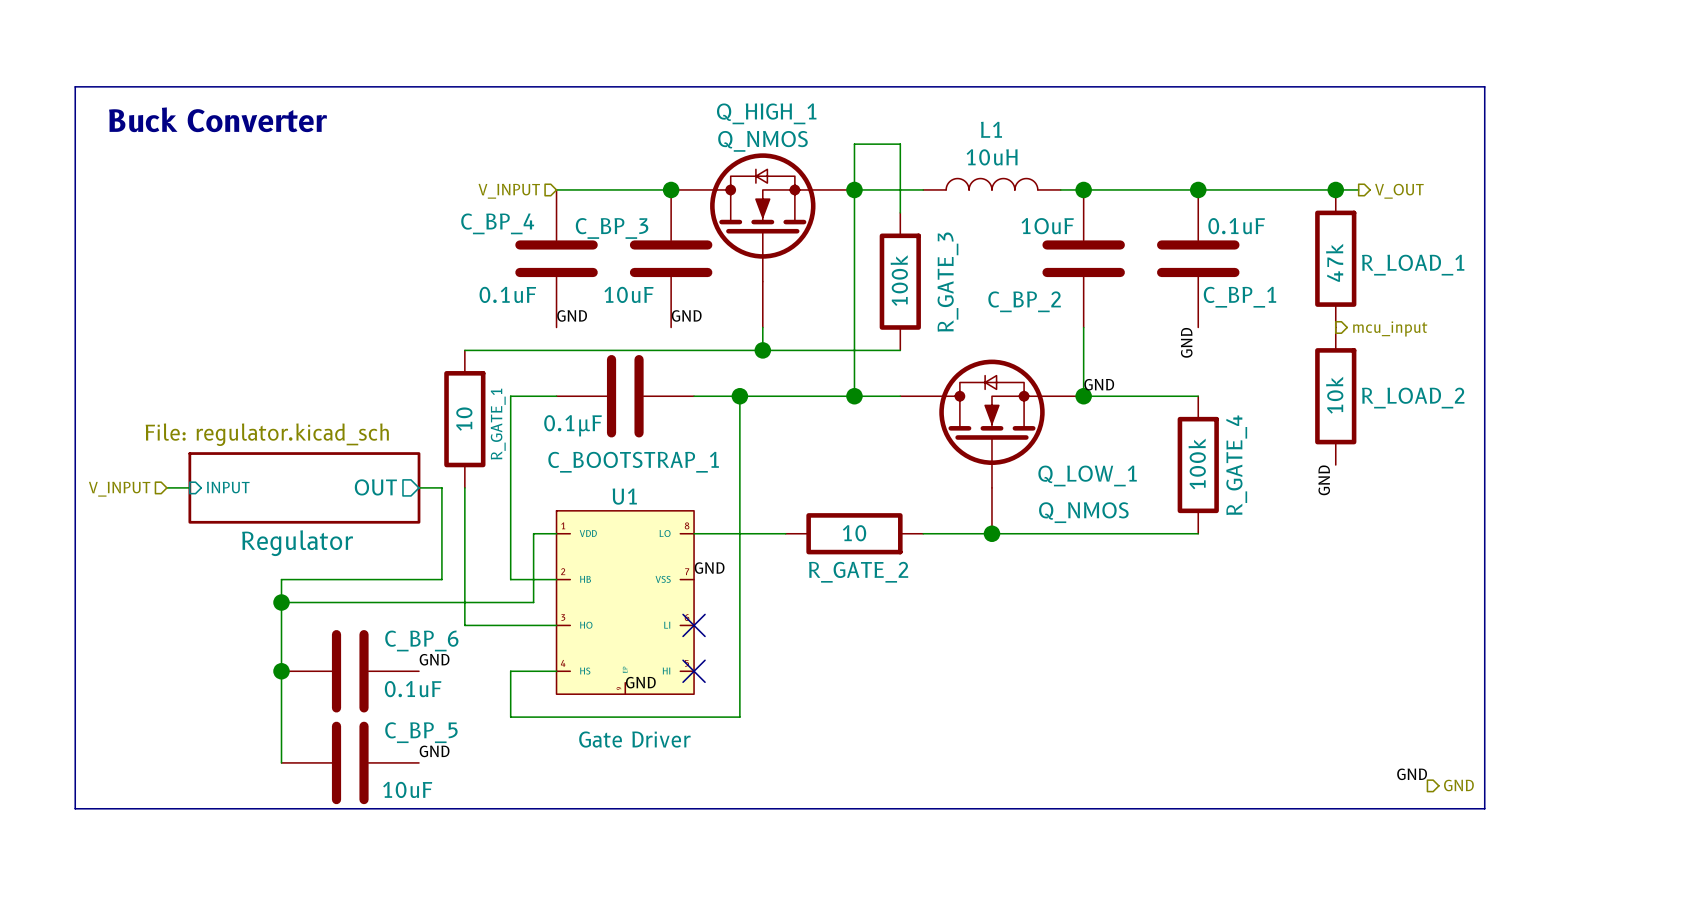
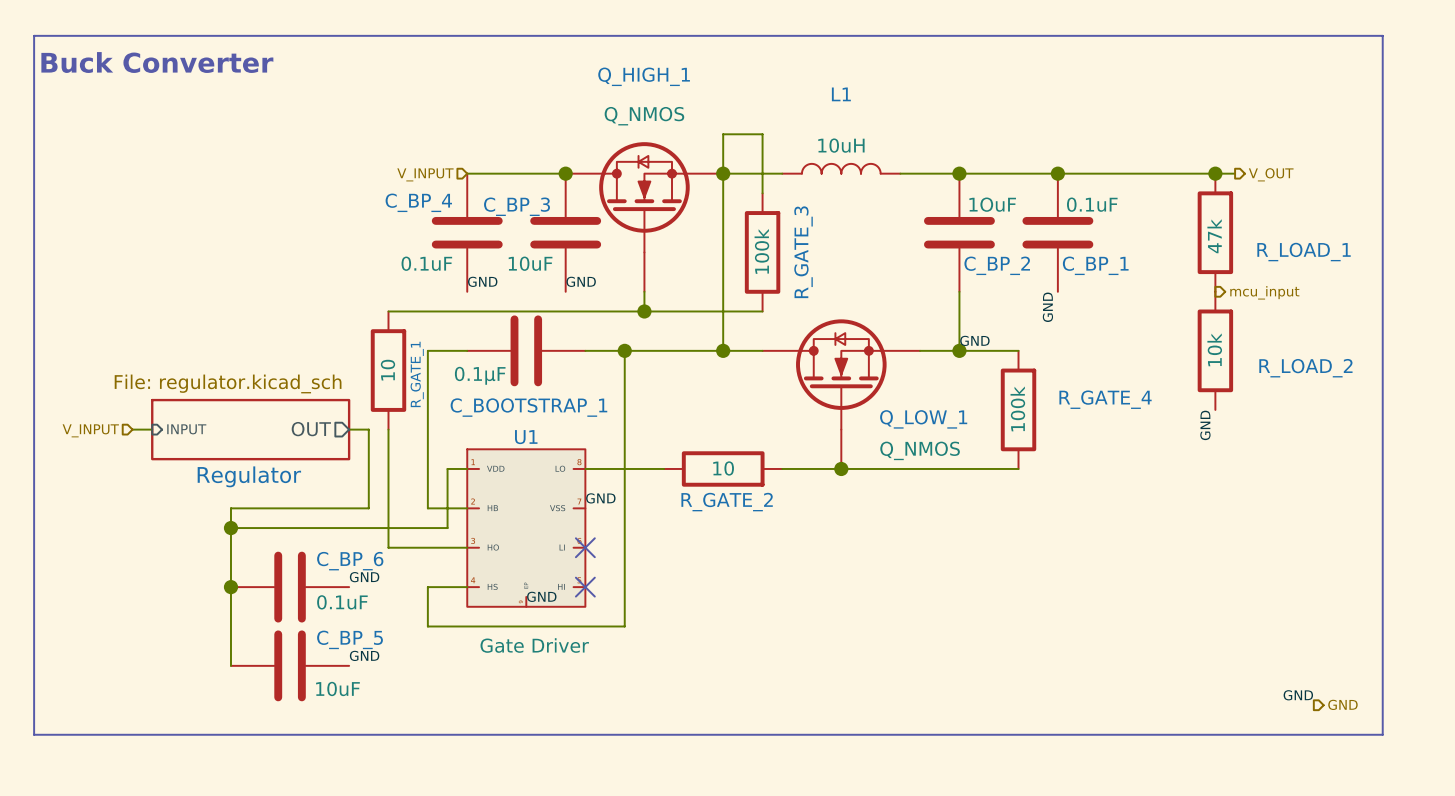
line: (75, 86) (1484, 86) (1484, 808) (75, 808) (75, 86) -> (34, 35) (34, 734) (1382, 734) (1382, 35) (34, 35)
Q_HIGH_1 name position: Q_HIGH_1 (766, 113) -> Q_HIGH_1 (644, 76)
text position: Buck Converter (218, 119) -> Buck Converter (157, 62)
L1 name position: L1 (991, 129) -> L1 (841, 94)
Q_HIGH_1 value position: Q_NMOS (762, 141) -> Q_NMOS (644, 116)
junction: (1083, 189) -> none
junction: none -> (959, 173)
junction: (1198, 189) -> none
junction: none -> (1057, 173)
junction: (1335, 189) -> none
wire: none -> (1156, 173) (1235, 173)
junction: none -> (1215, 173)
hierarchical label position: V_OUT (1399, 191) -> V_OUT (1271, 174)
C_BP_2 value position: 1OuF (1047, 226) -> 1OuF (992, 204)
C_BP_2 position: (1083, 258) -> (959, 232)
C_BP_1 position: (1198, 258) -> (1057, 232)
R_LOAD_1 position: (1335, 258) -> (1215, 232)
R_LOAD_1 name position: R_LOAD_1 (1413, 265) -> R_LOAD_1 (1304, 252)
C_BP_2 name position: C_BP_2 (1024, 301) -> C_BP_2 (997, 265)
wire: (1083, 327) (1083, 396) -> (959, 291) (959, 350)
hierarchical label position: mcu_input (1390, 329) -> mcu_input (1264, 292)
label: GND (1186, 342) -> none
label: none -> GND (1047, 307)
label: GND (1099, 384) -> none
label: none -> GND (974, 340)
junction position: (1083, 396) -> (959, 350)
R_LOAD_2 position: (1335, 396) -> (1215, 350)
R_LOAD_2 name position: R_LOAD_2 (1413, 398) -> R_LOAD_2 (1305, 368)
R_GATE_4 name rotation: 0° (1236, 465) -> 90° clockwise (1105, 399)
label: GND (1324, 480) -> none
label: none -> GND (1205, 425)
label position: GND (1412, 774) -> GND (1298, 695)
hierarchical label position: GND (1458, 785) -> GND (1342, 704)

